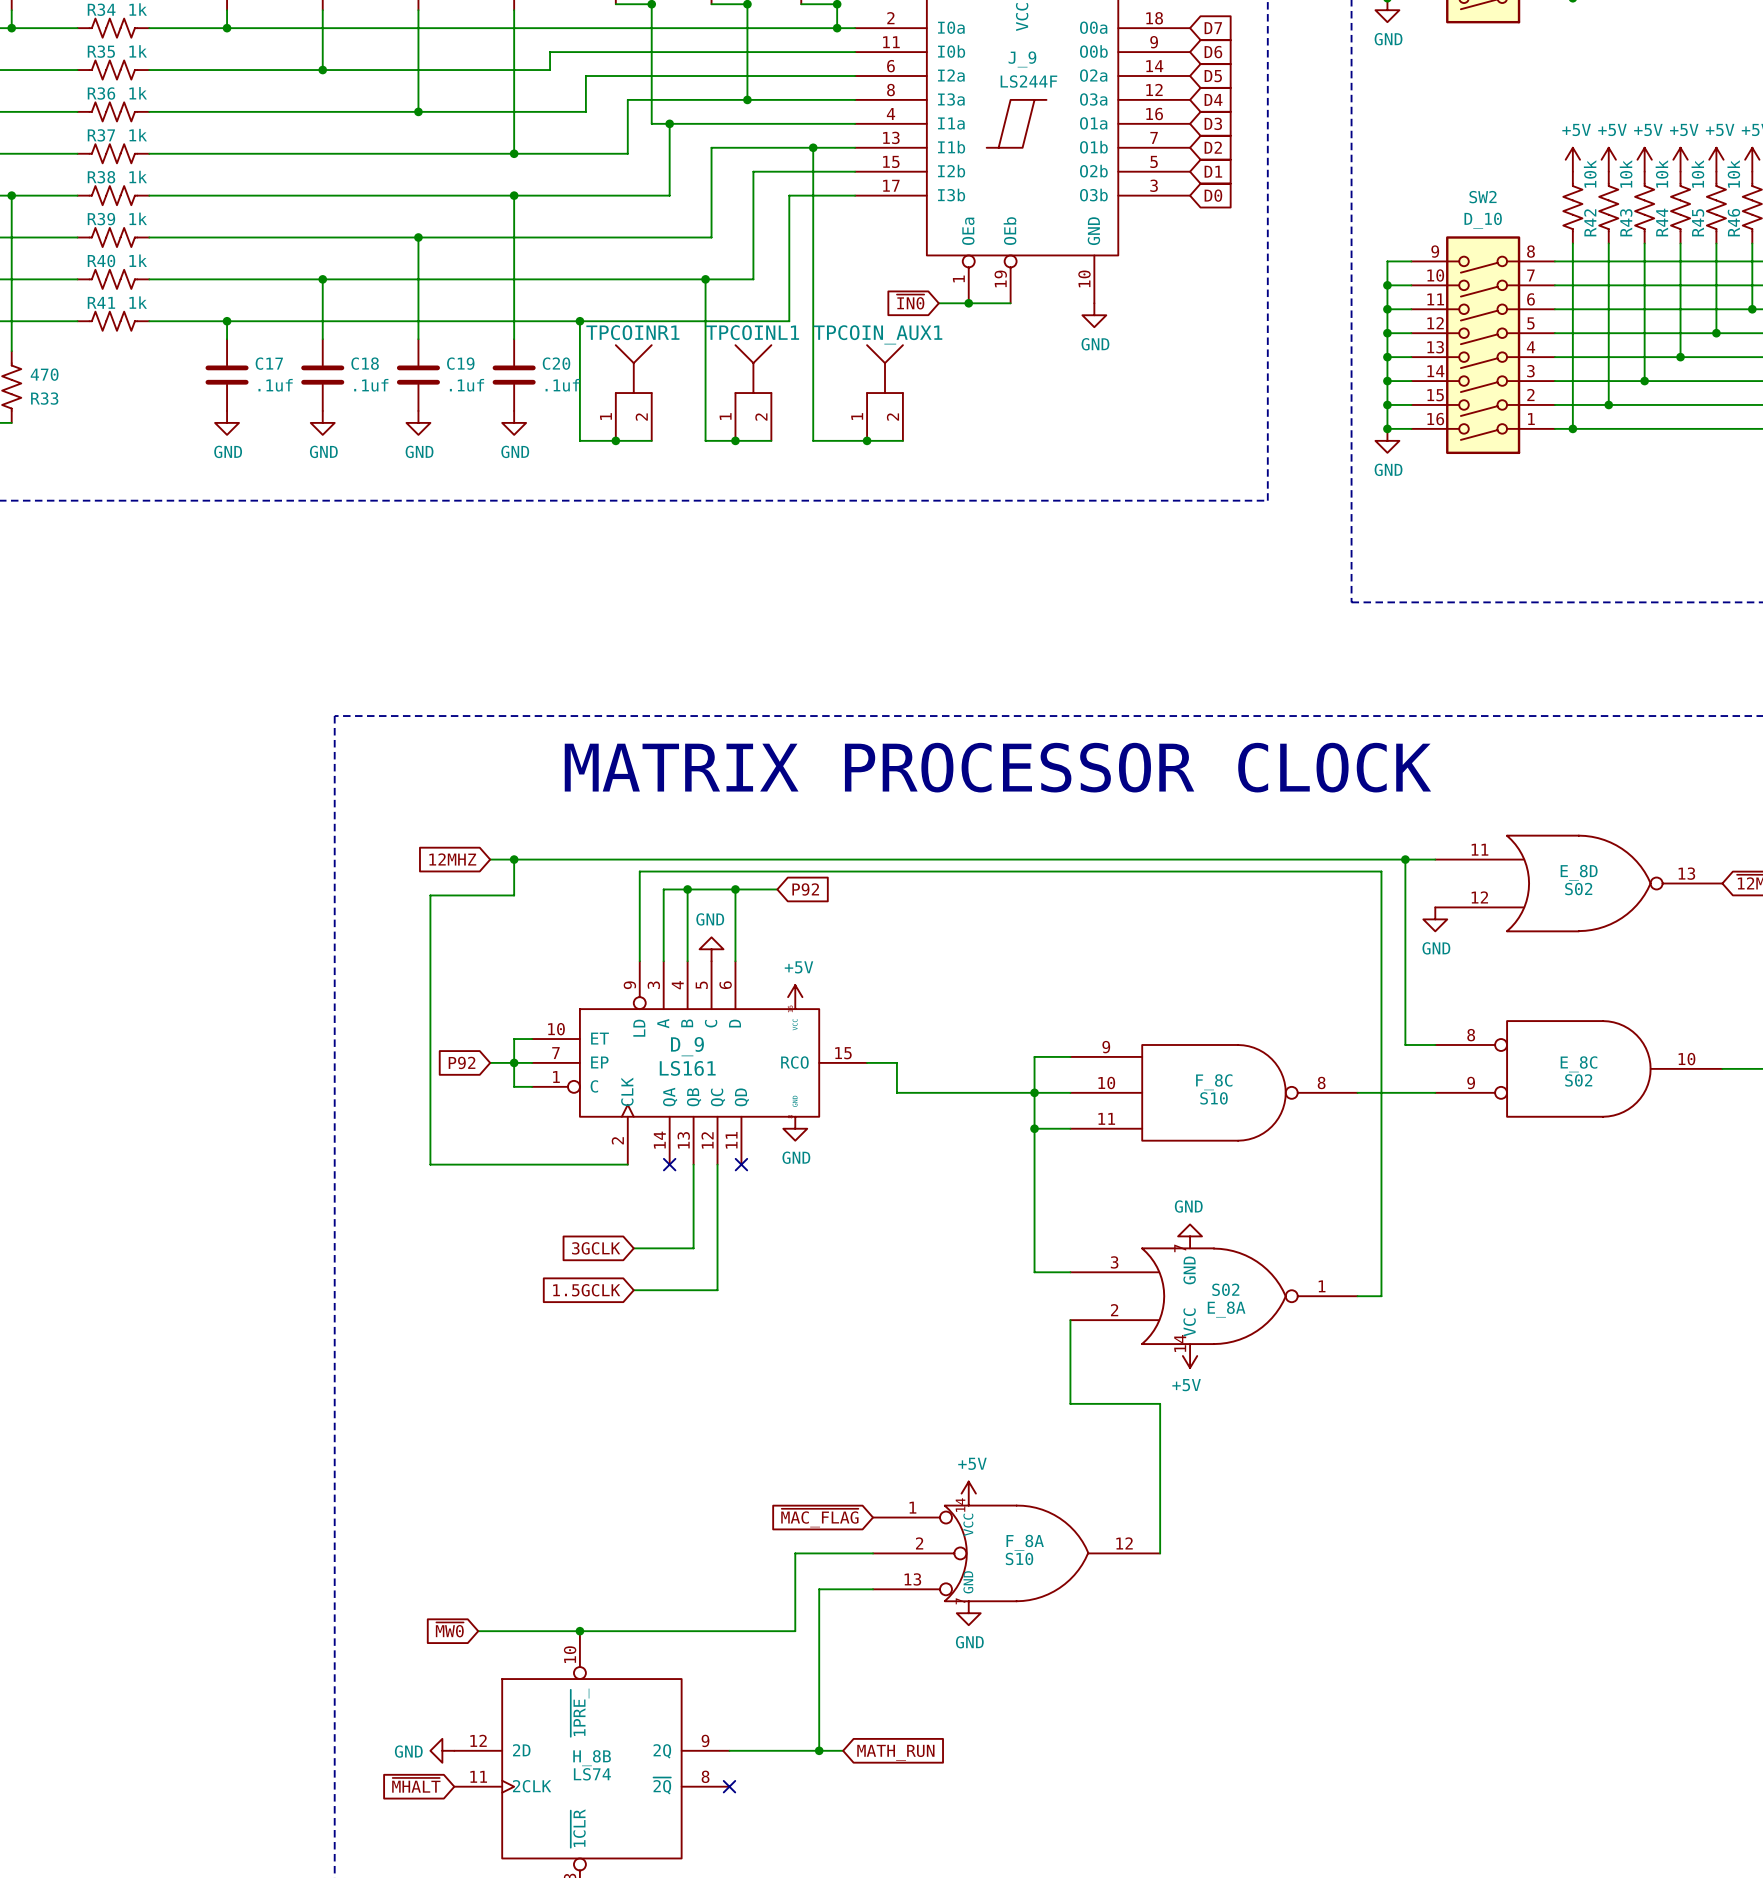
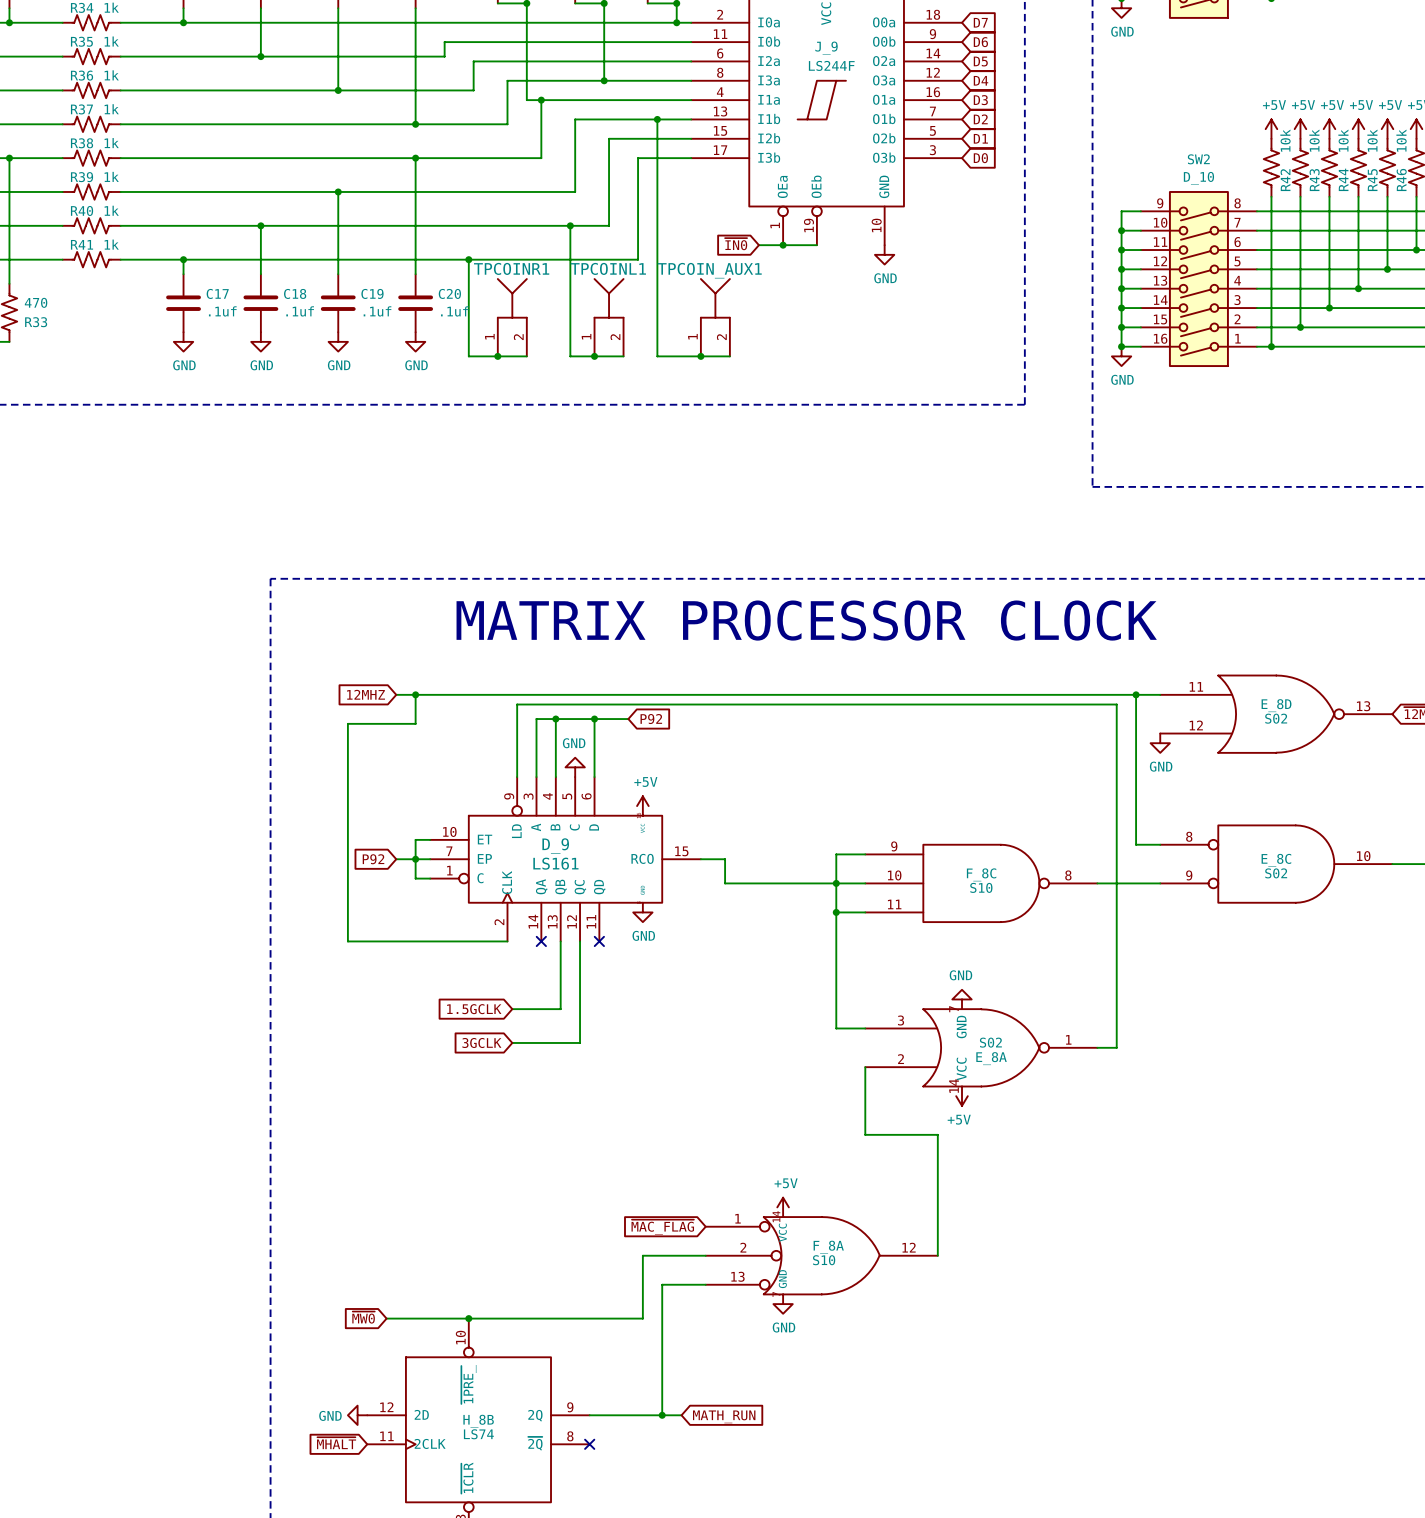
global label: 3GCLK (596, 1248) -> 1.5GCLK (474, 1009)
global label: 1.5GCLK (586, 1290) -> 3GCLK (481, 1042)

